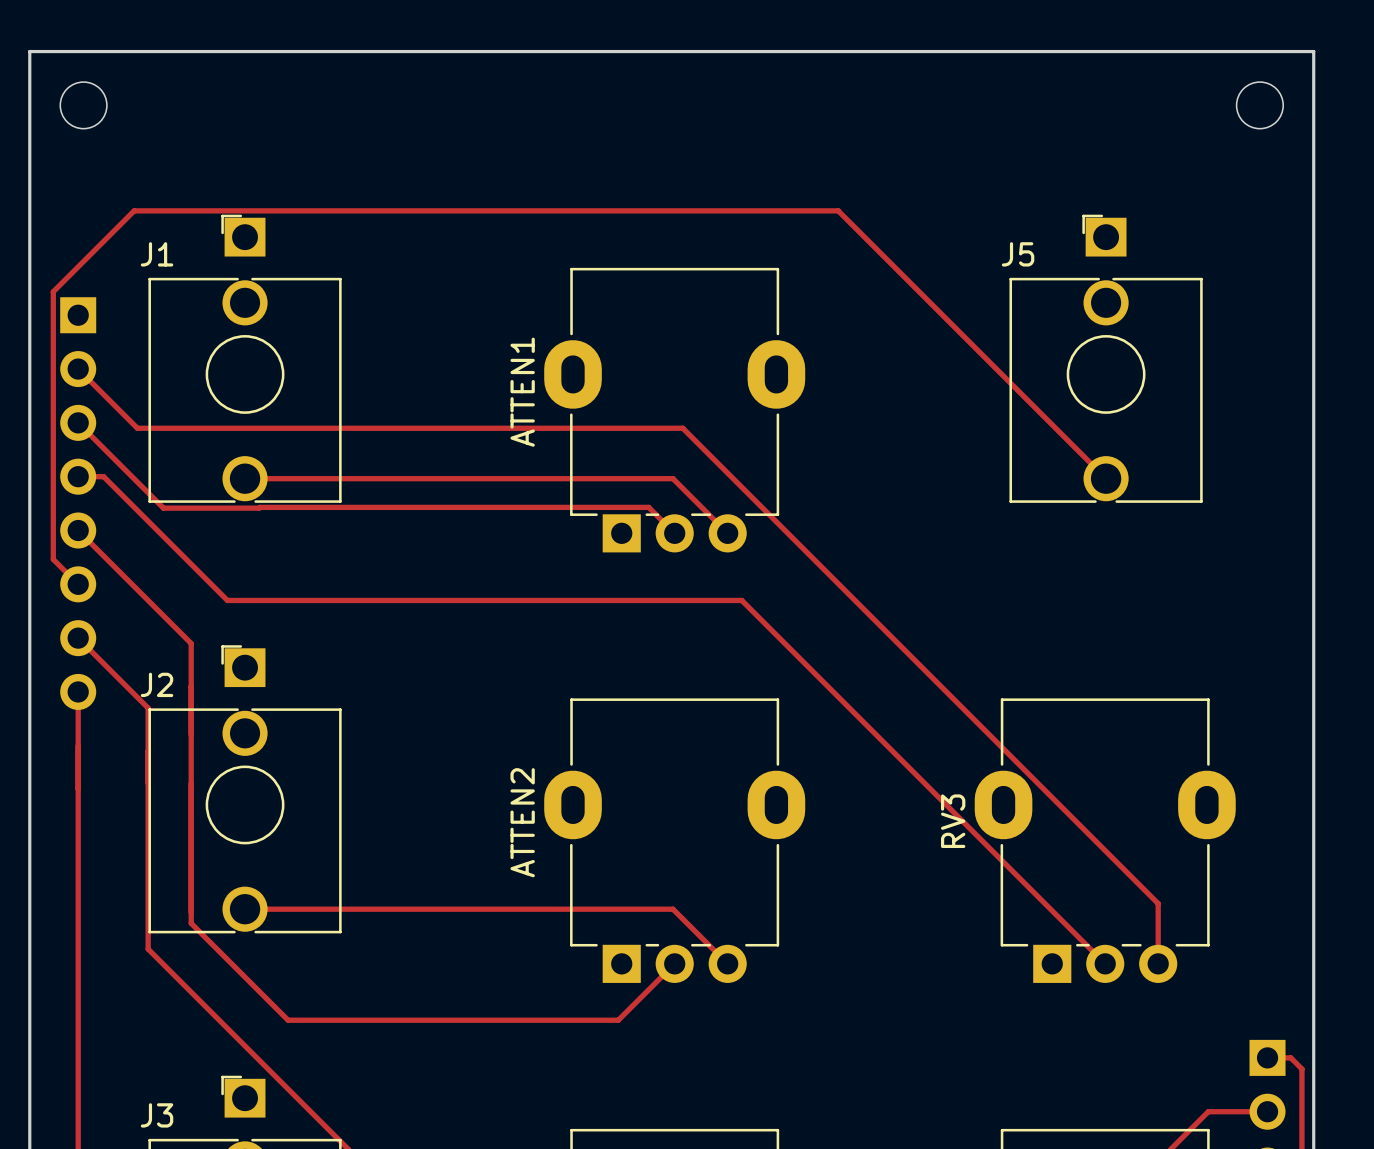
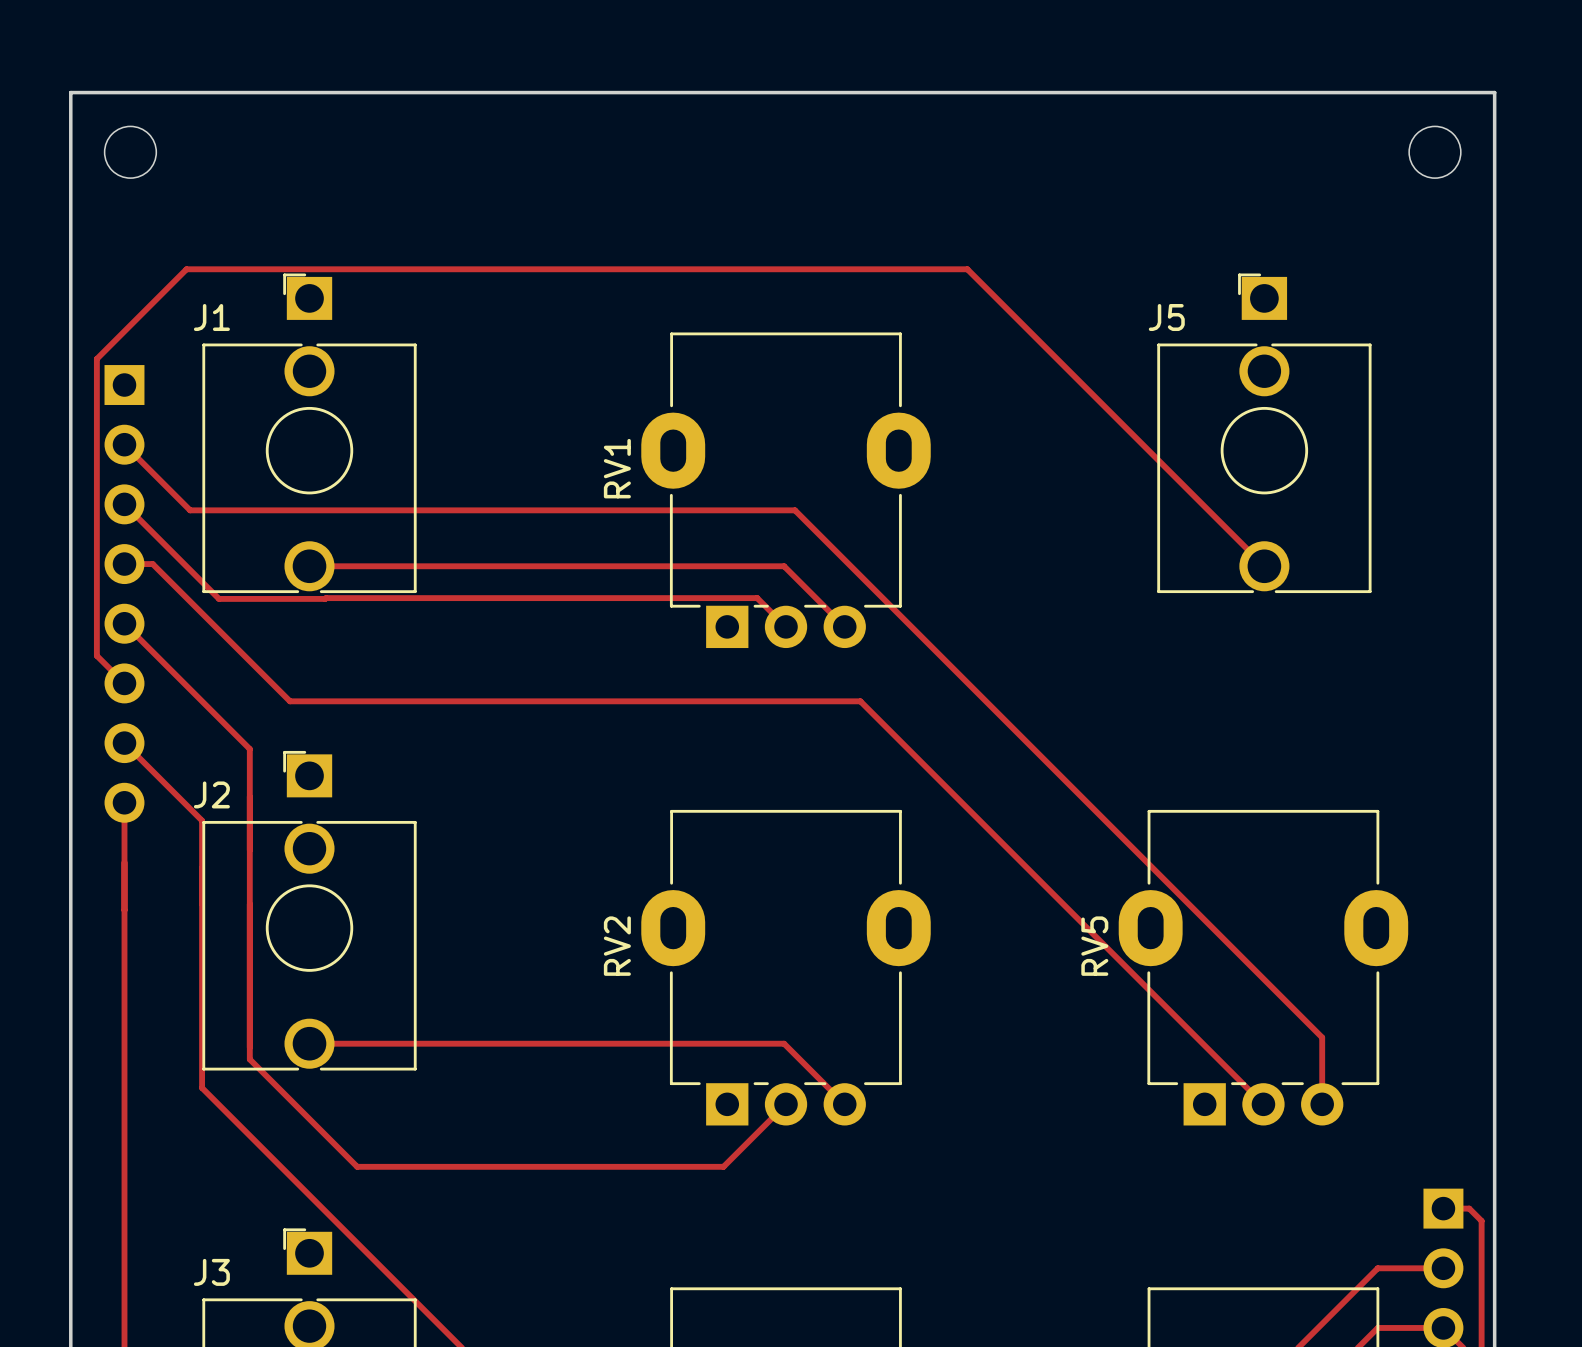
ATTEN1 name: ATTEN1 (522, 392) -> RV1 (617, 468)
RV3 name: RV3 (953, 821) -> RV5 (1094, 946)
ATTEN2 name: ATTEN2 (522, 822) -> RV2 (617, 946)

